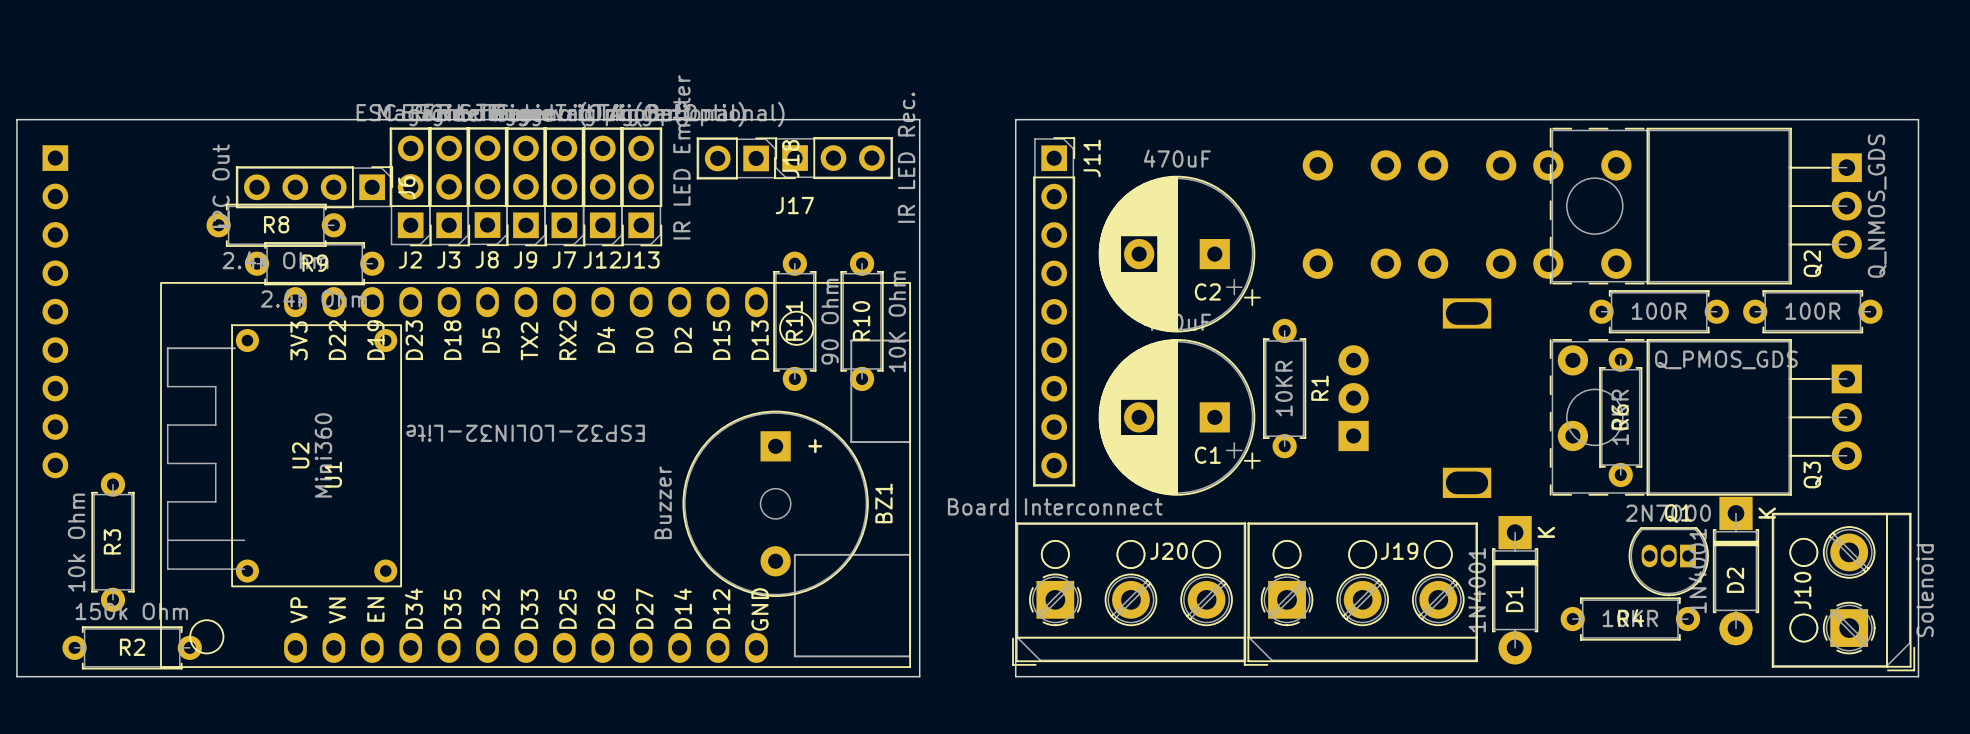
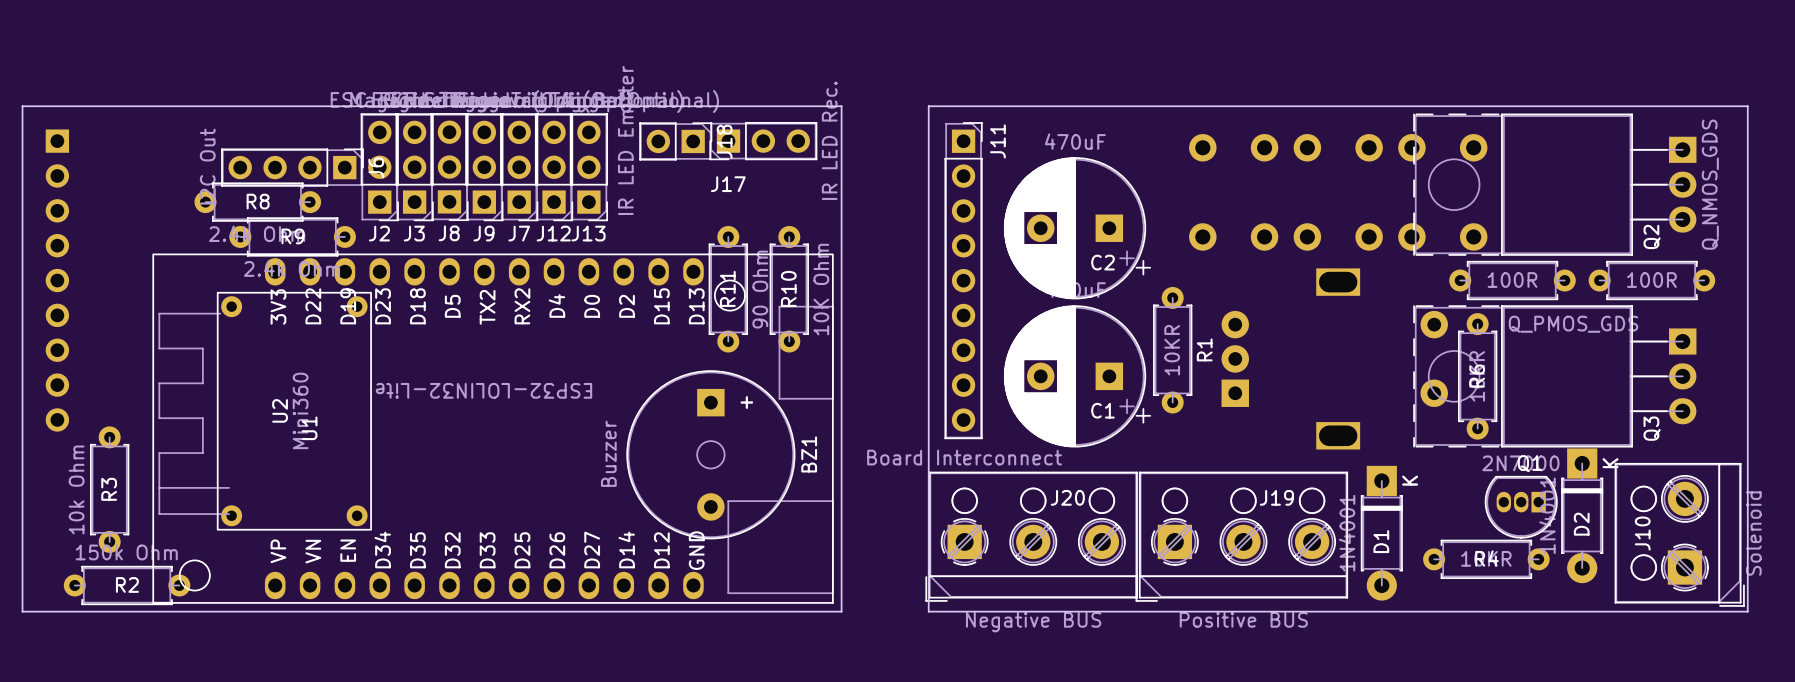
J19 value: none -> Positive BUS (1243, 619)
J20 value: none -> Negative BUS (1033, 622)

